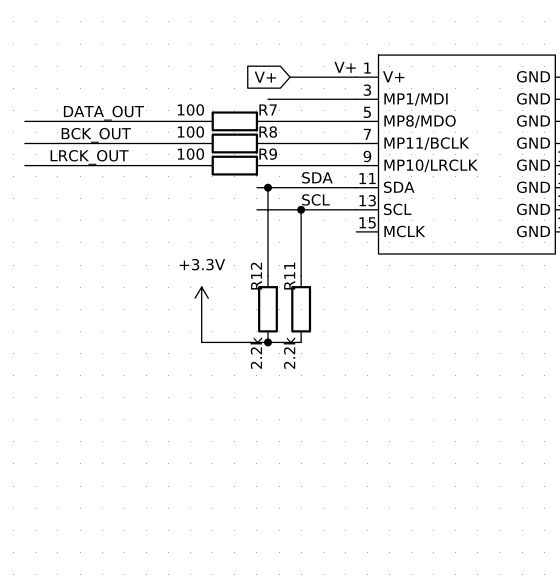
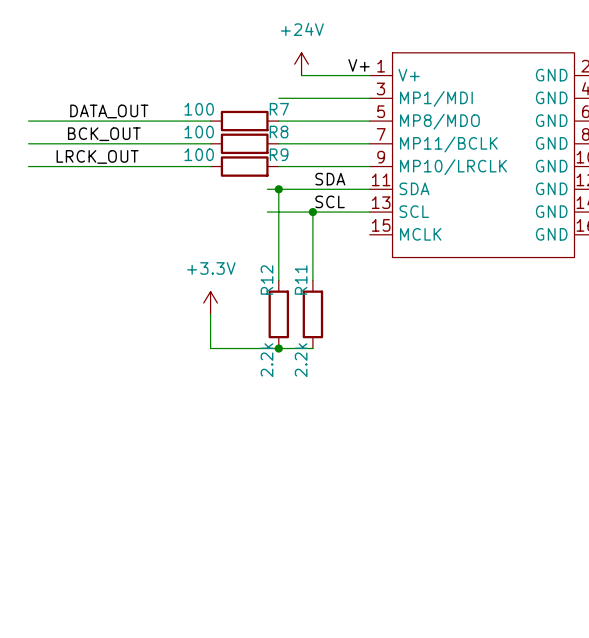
power symbol: none -> +24V (301, 64)
global label: V+ (265, 77) -> none

